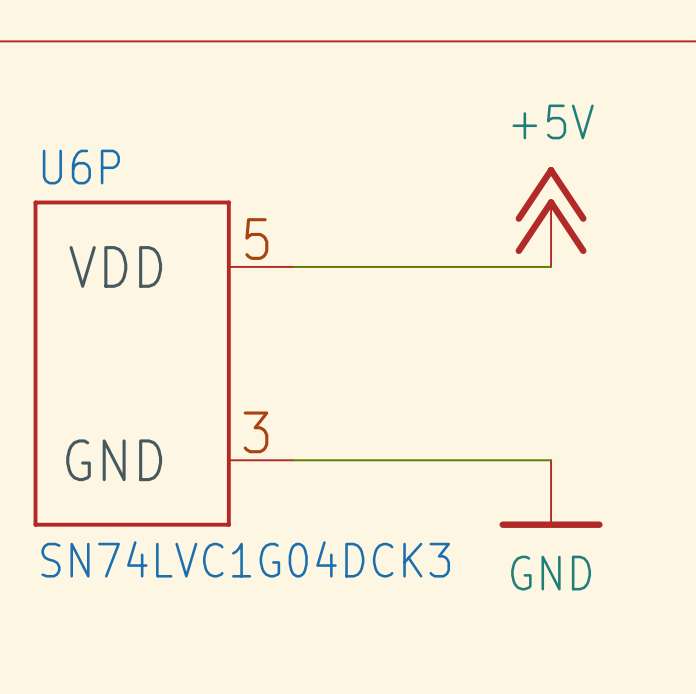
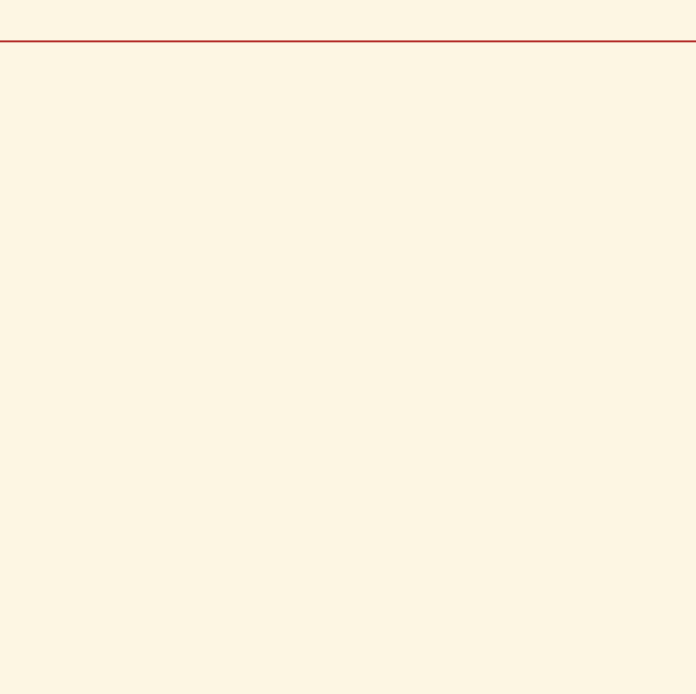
power symbol: +5V (551, 216) -> none
wire: (293, 266) (551, 266) -> none
U6P: (163, 363) -> none
wire: (293, 460) (551, 460) -> none
power symbol: GND (551, 494) -> none

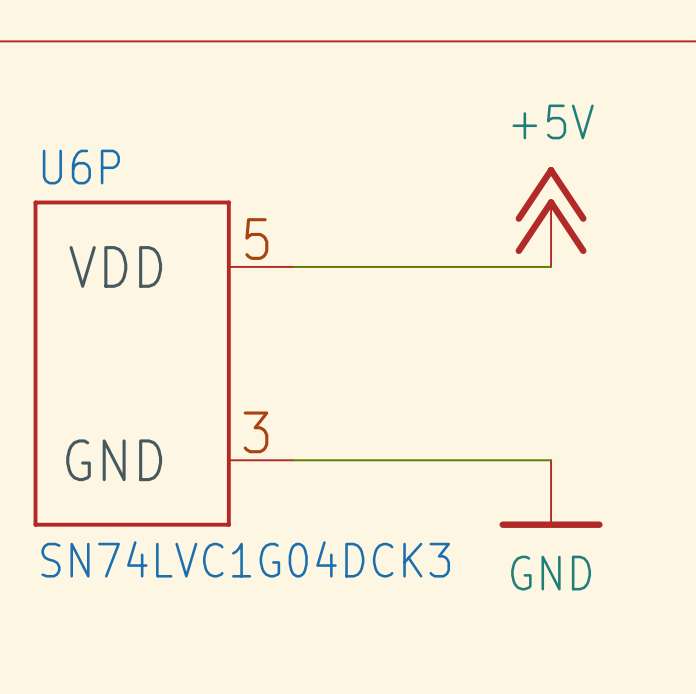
power symbol: none -> +5V (551, 216)
wire: none -> (293, 266) (551, 266)
U6P: none -> (163, 363)
wire: none -> (293, 460) (551, 460)
power symbol: none -> GND (551, 494)

